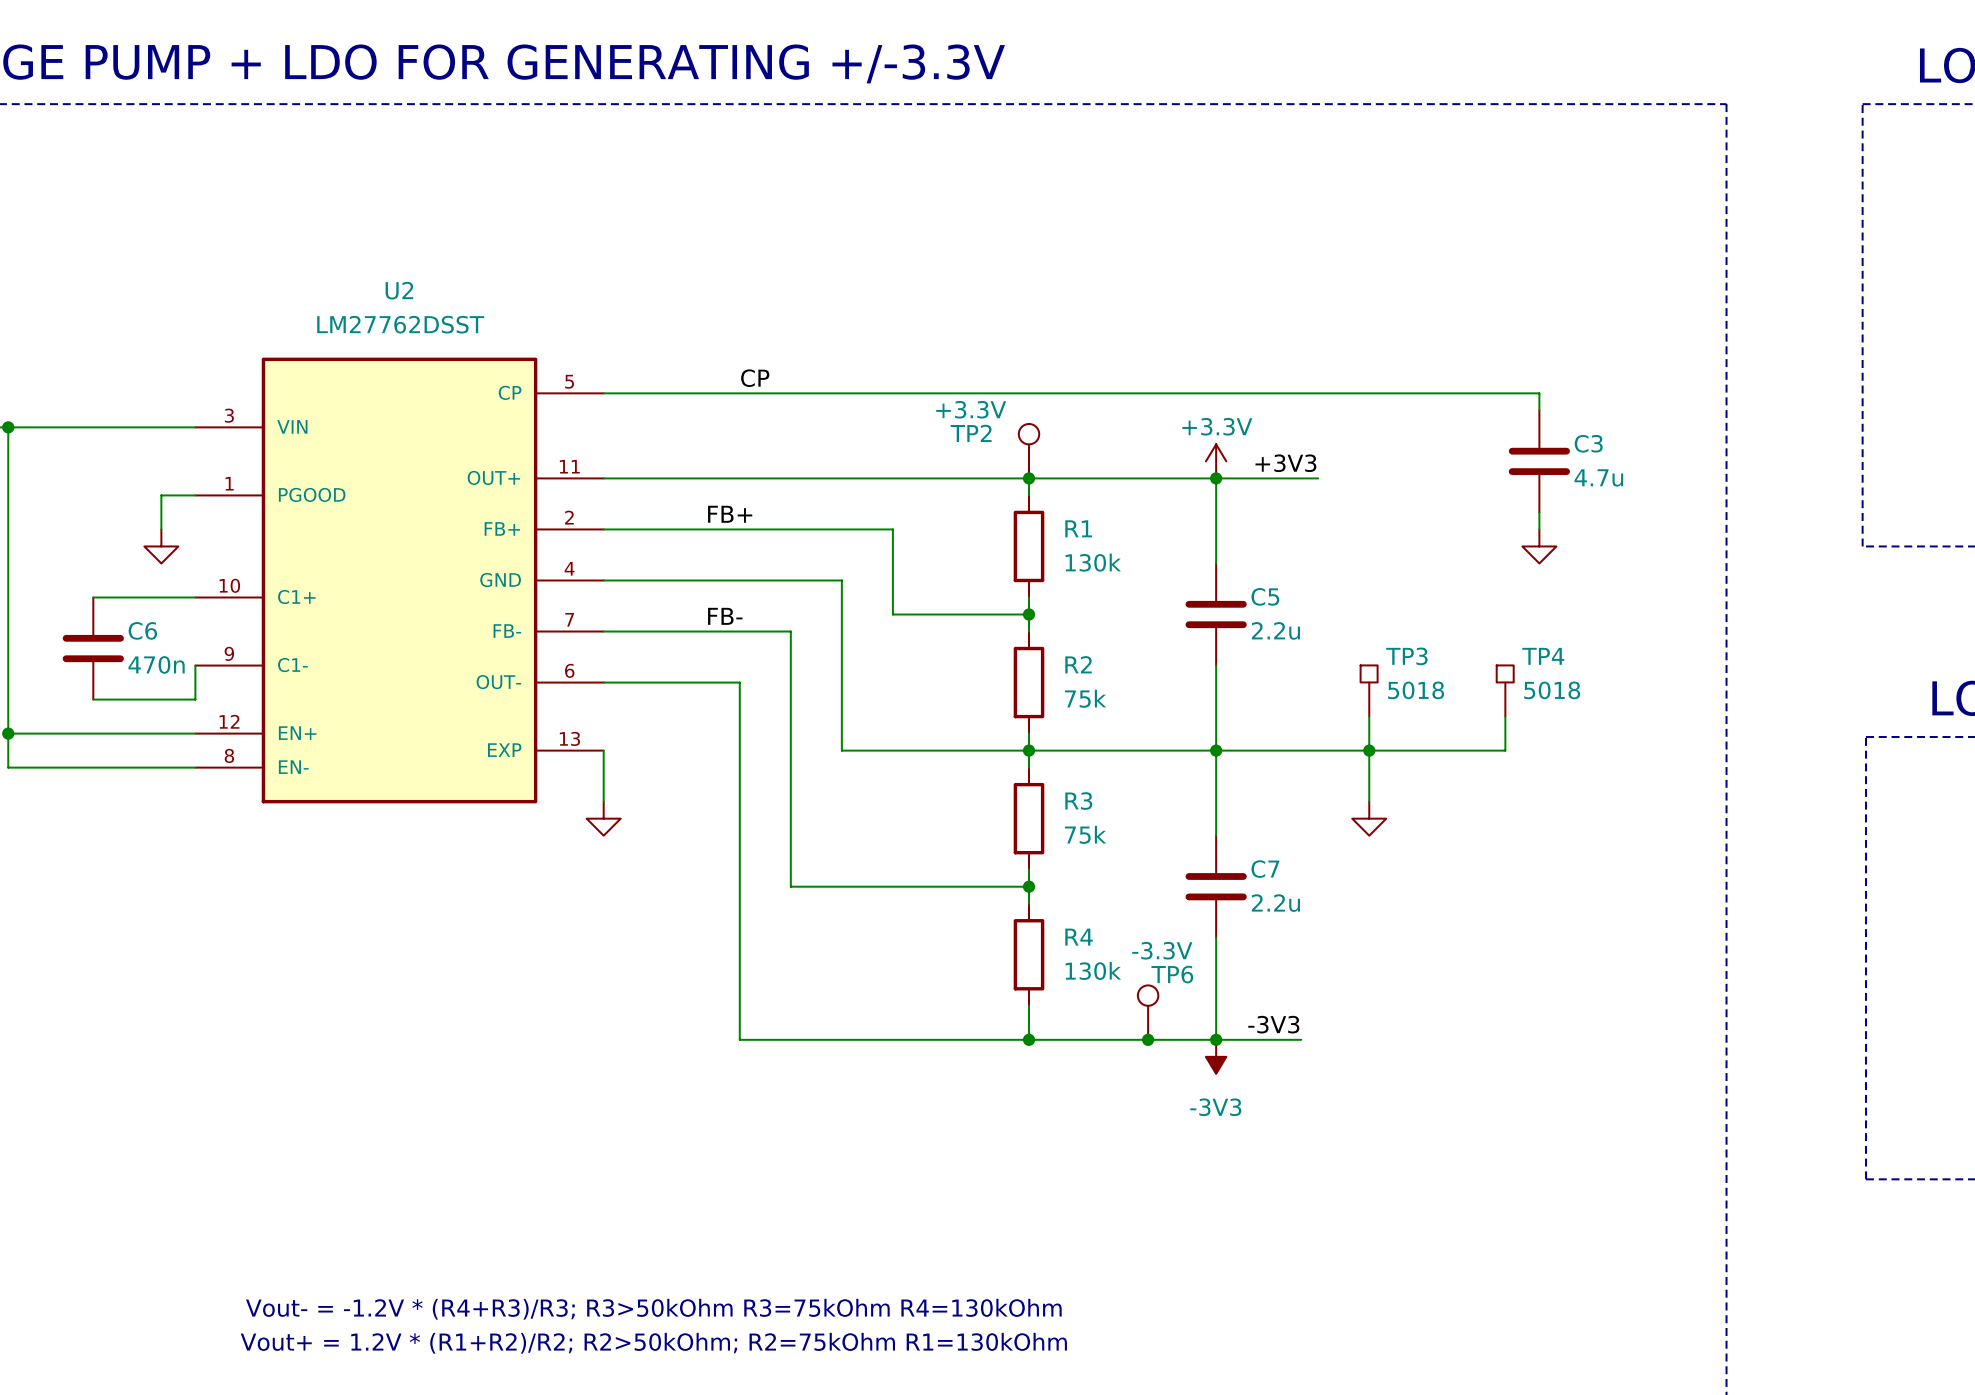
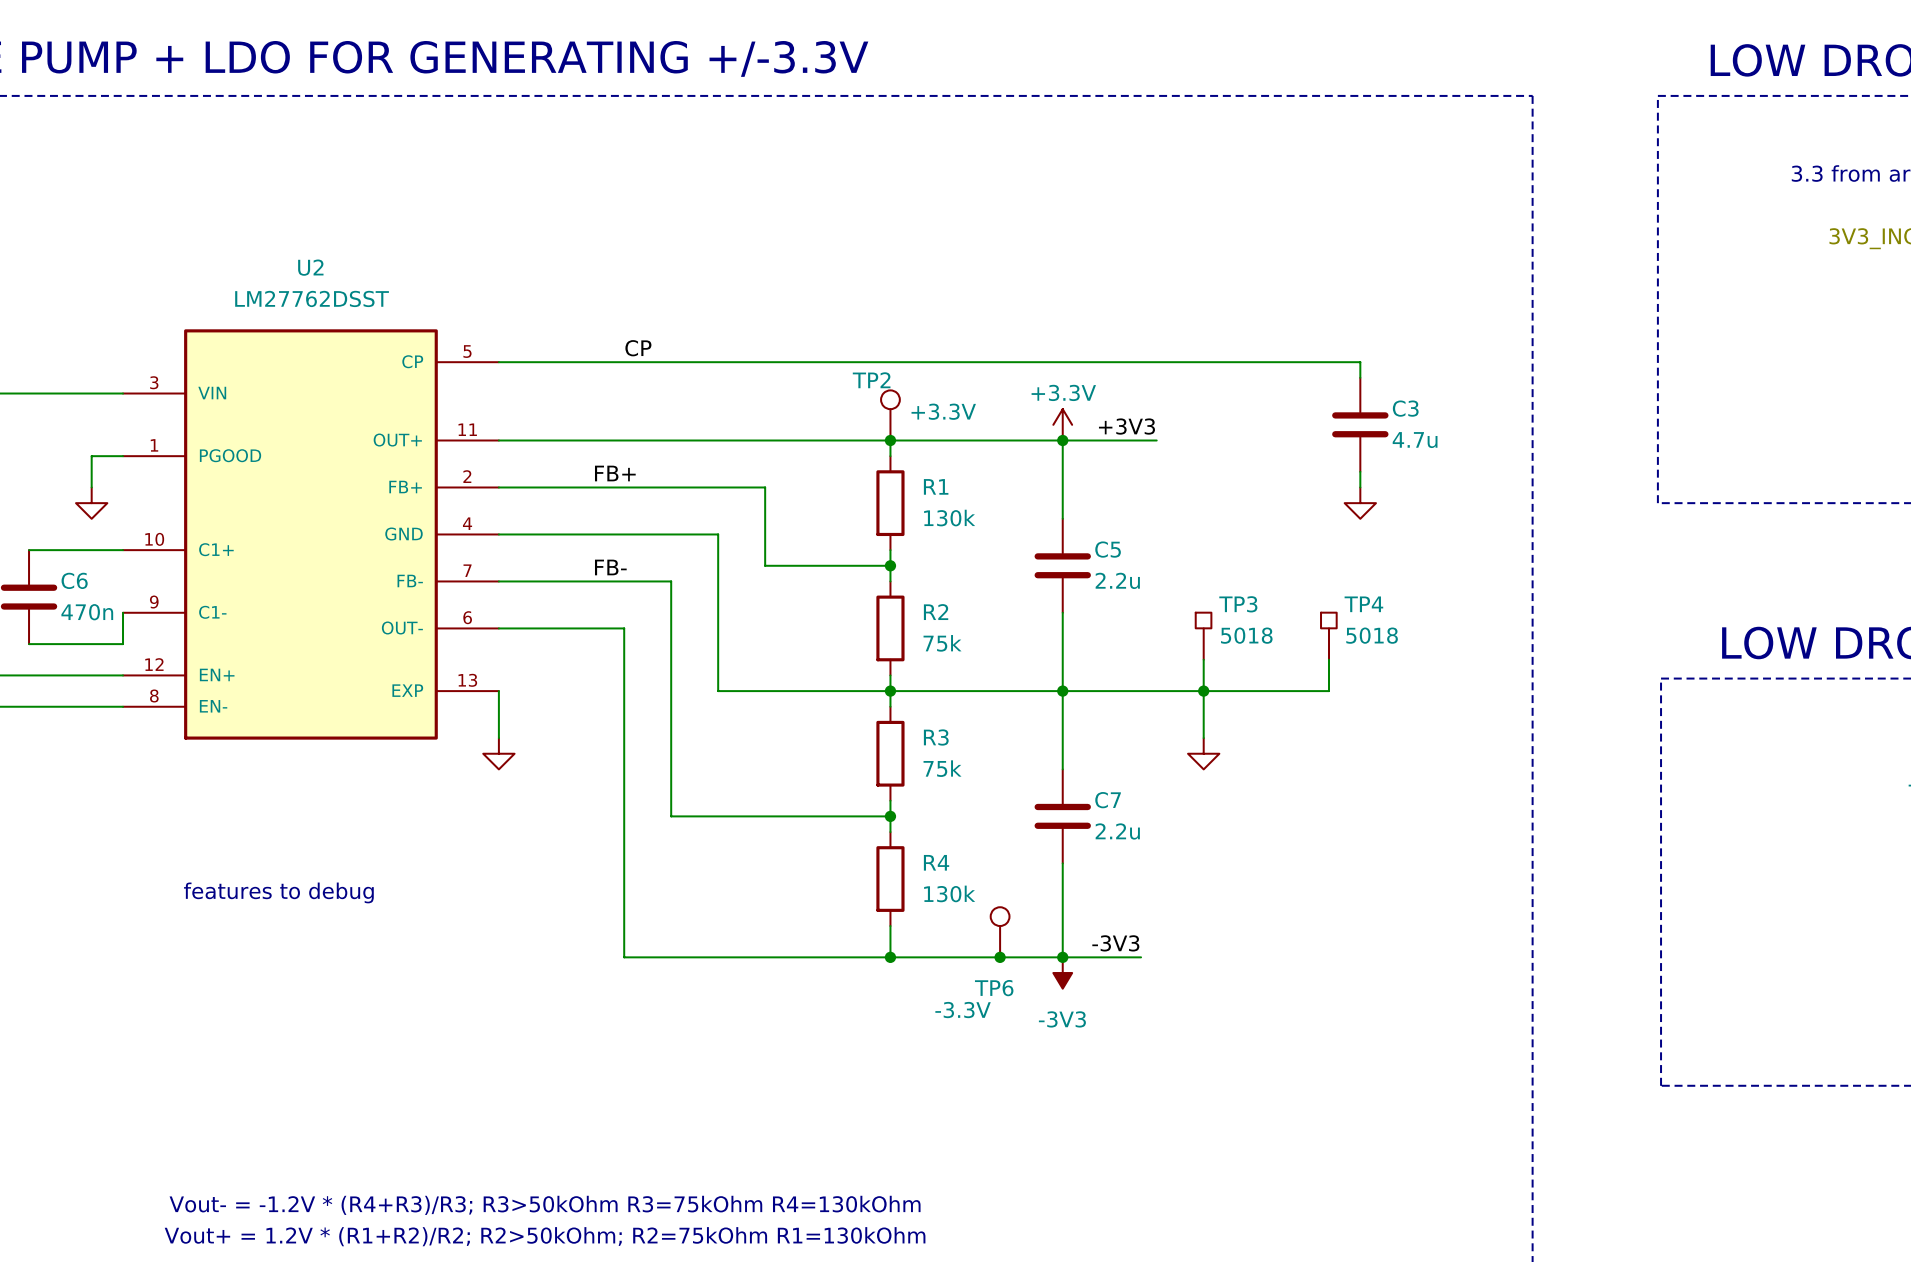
TP2 value position: +3.3V (971, 409) -> +3.3V (943, 411)
TP2 name position: TP2 (971, 433) -> TP2 (871, 380)
TP6 value position: -3.3V (1162, 950) -> -3.3V (963, 1010)
text: none -> features to debug (278, 892)
TP6 name position: TP6 (1172, 974) -> TP6 (994, 988)

